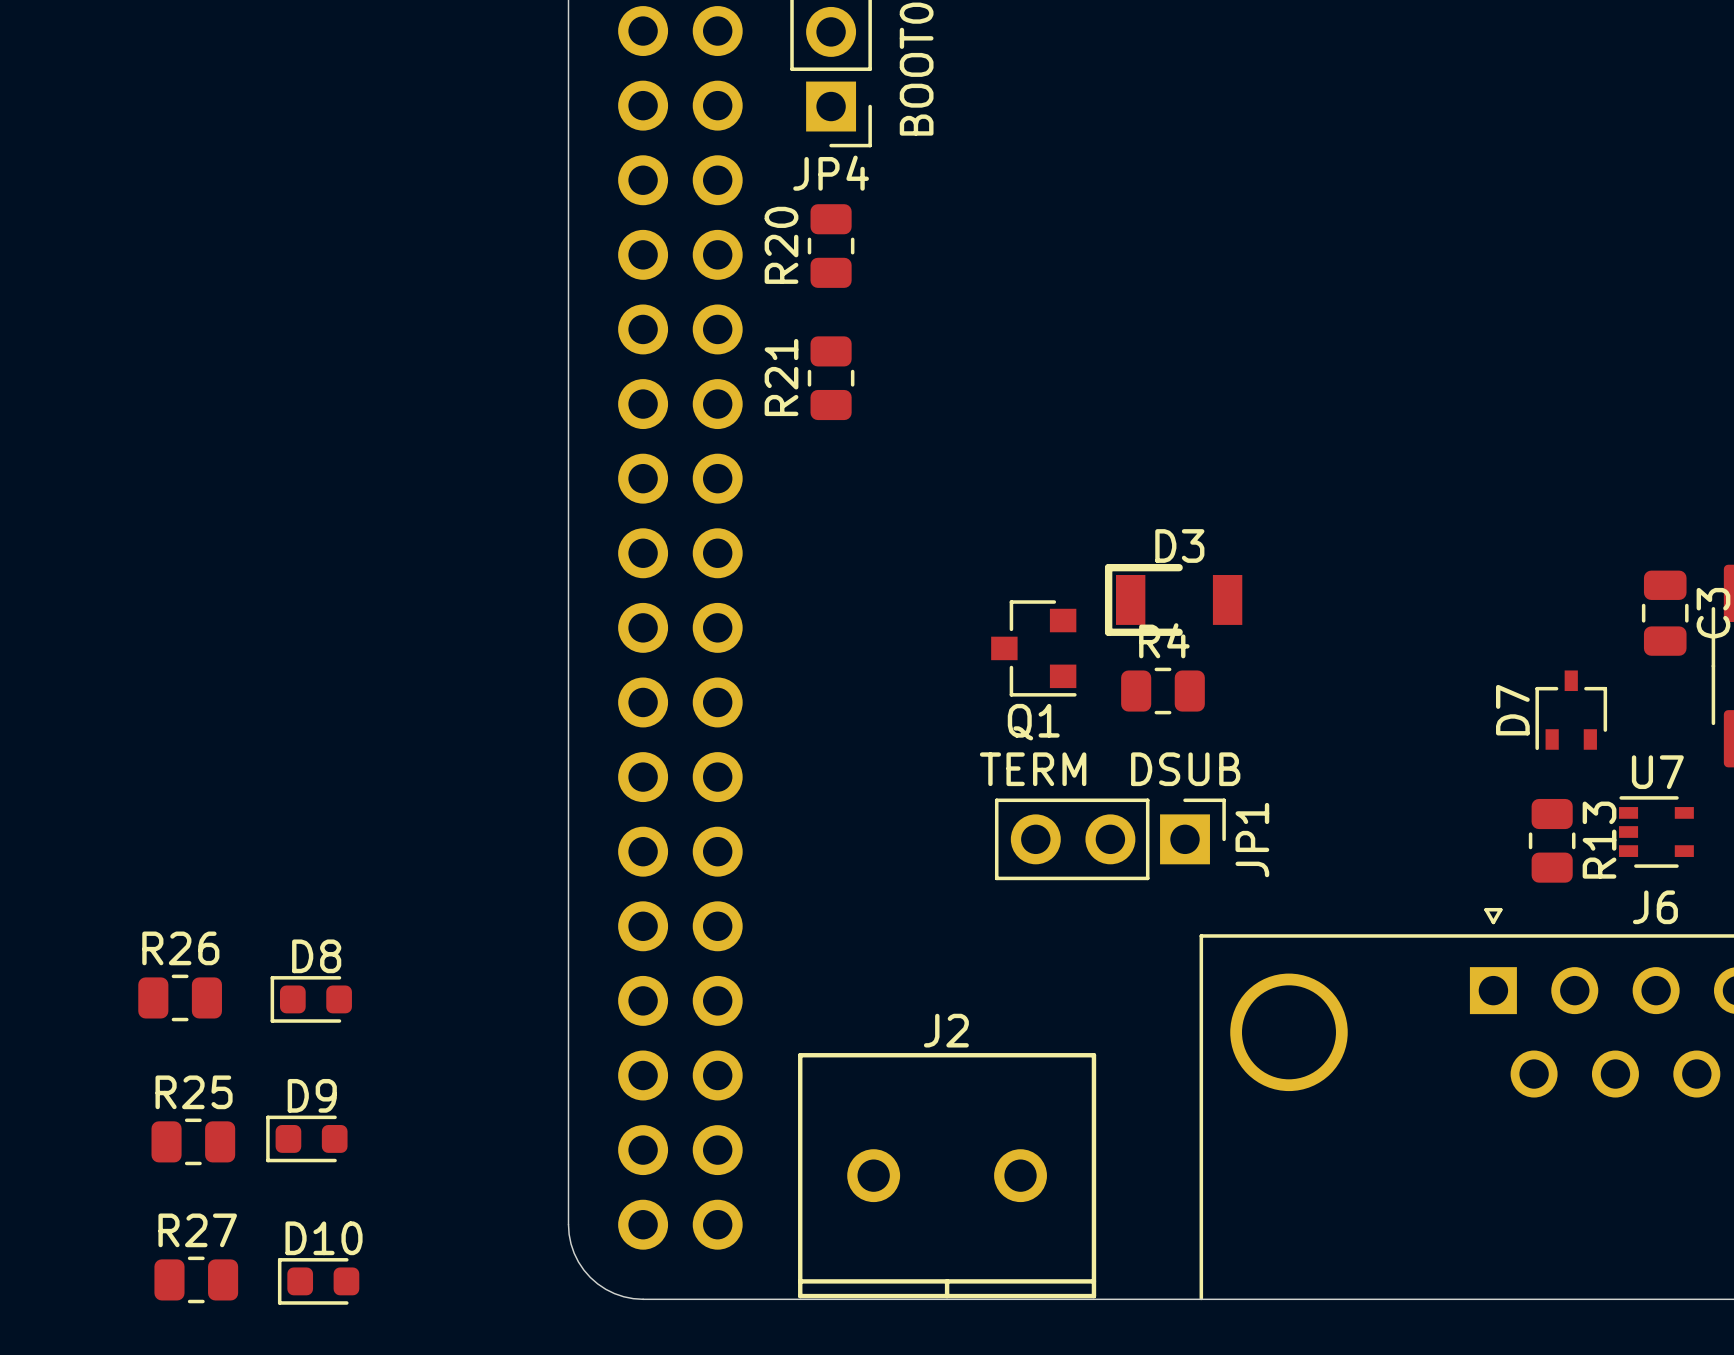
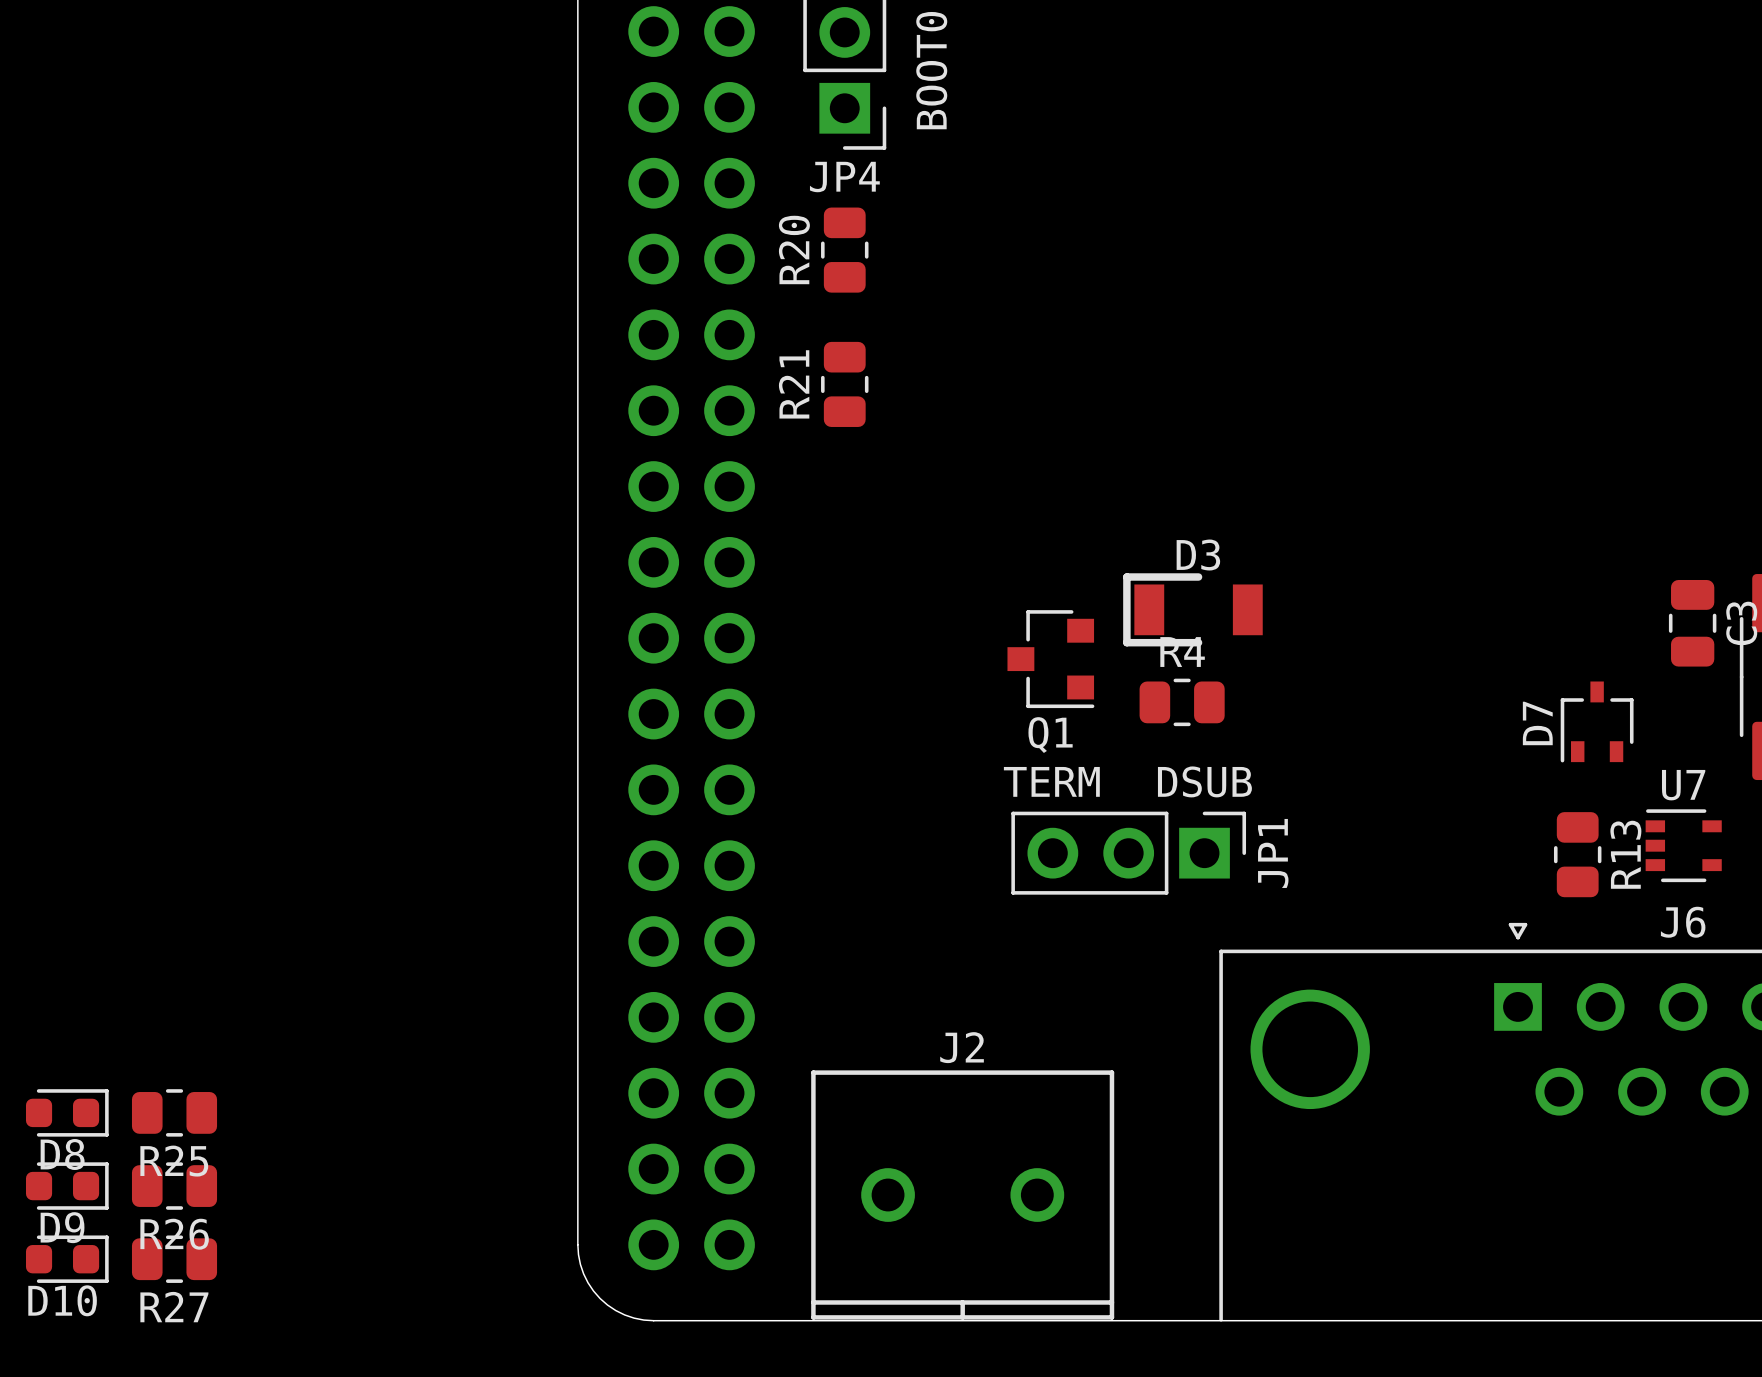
R26 name position: R26 (180, 948) -> R26 (174, 1234)
R26 position: (180, 997) -> (174, 1186)
D8 rotation: 0° (311, 999) -> 180° (67, 1112)
D8 position: (311, 999) -> (67, 1112)
R25 name position: R25 (194, 1092) -> R25 (174, 1161)
D9 rotation: 0° (306, 1138) -> 180° (67, 1186)
D9 position: (306, 1138) -> (67, 1186)
R25 position: (193, 1141) -> (174, 1112)
R27 name position: R27 (197, 1230) -> R27 (174, 1307)
R27 position: (196, 1279) -> (174, 1259)
D10 rotation: 0° (318, 1281) -> 180° (67, 1259)
D10 position: (318, 1281) -> (67, 1259)

